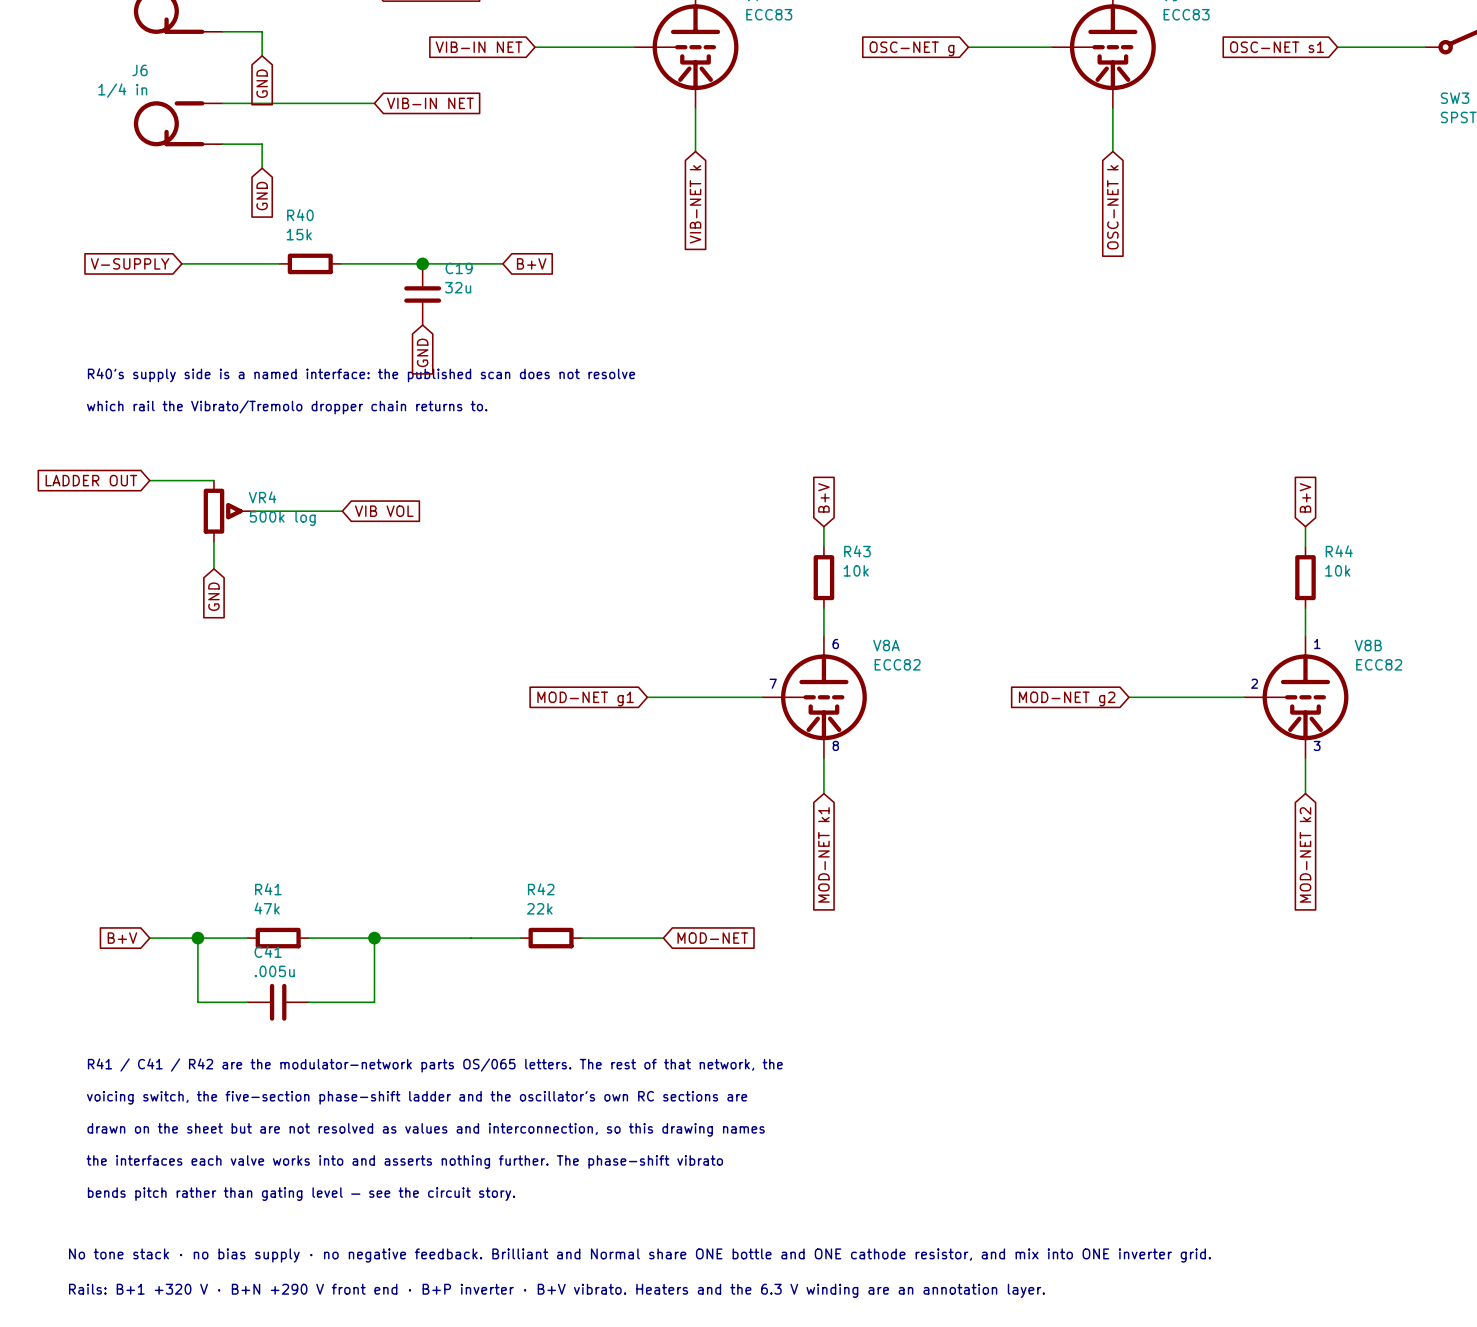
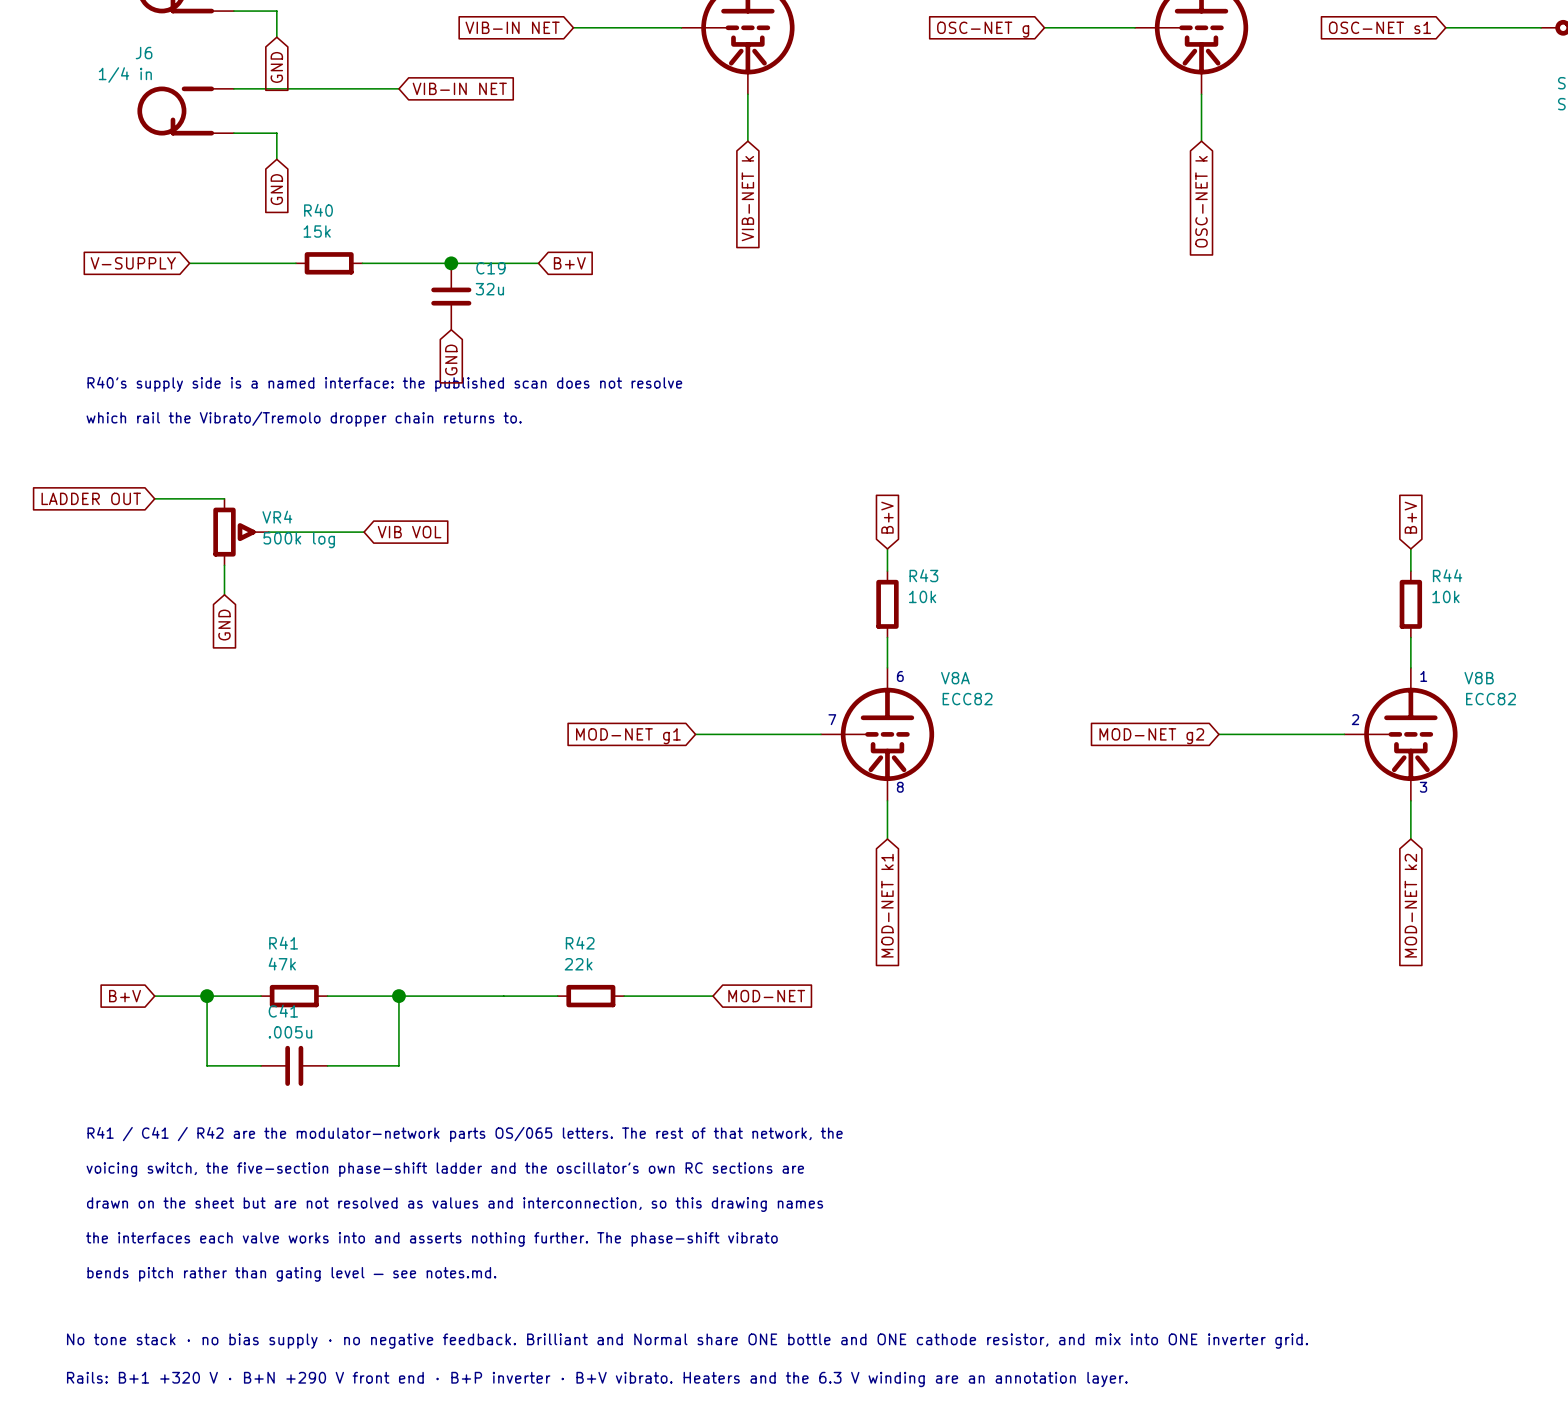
text: bends pitch rather than gating level — see the circuit story. (301, 1194) -> bends pitch rather than gating level — see notes.md. (291, 1274)

